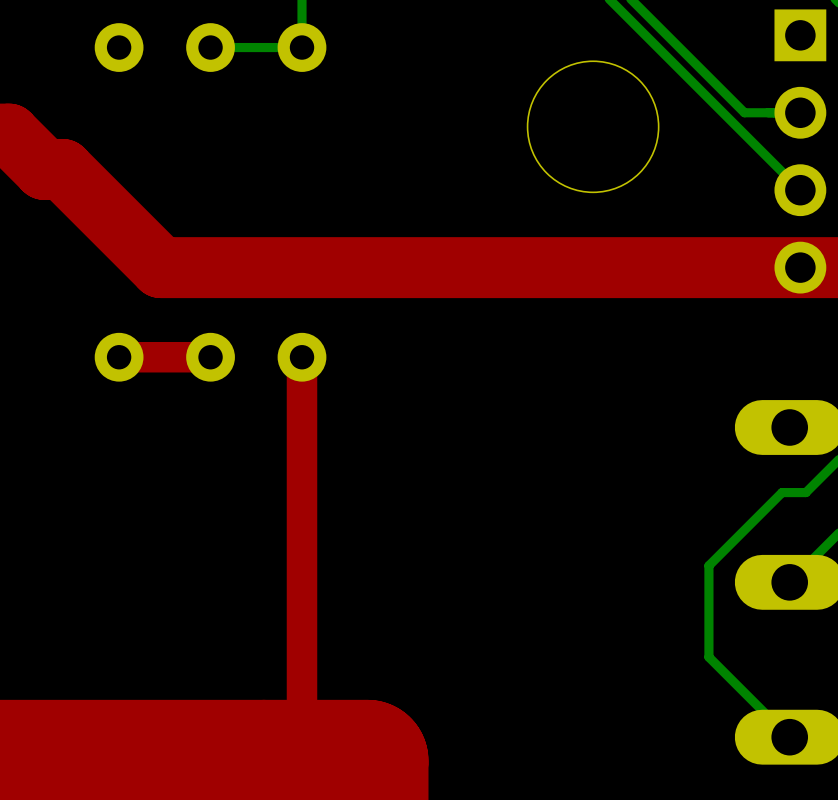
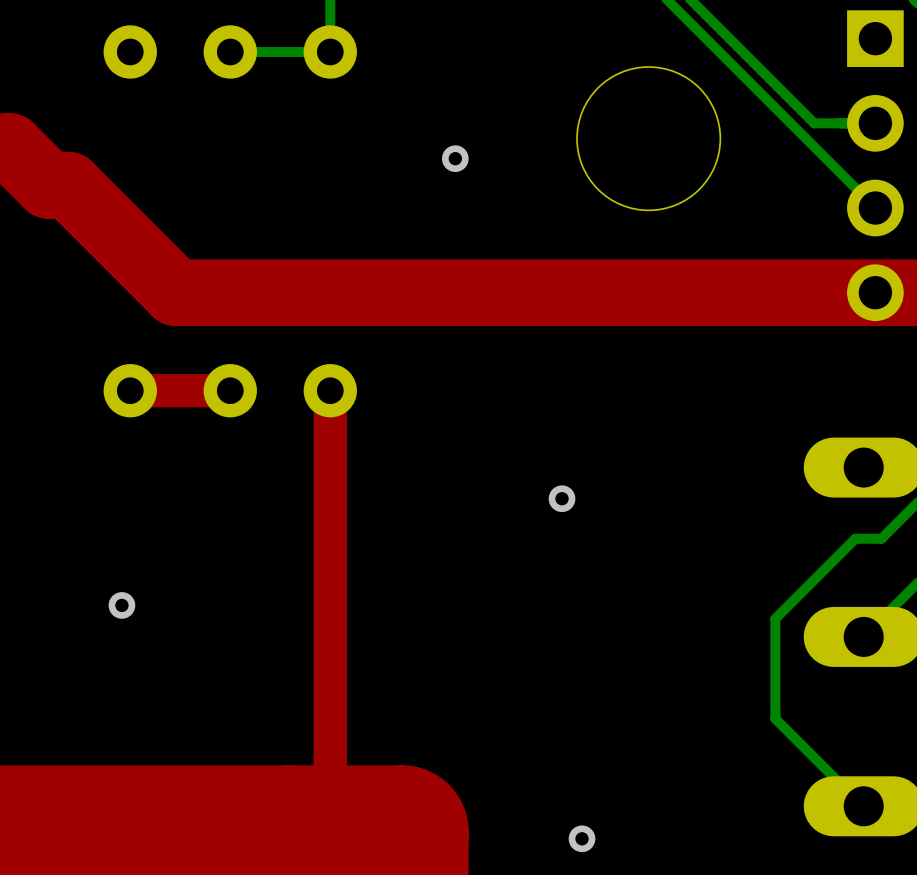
via: none -> (455, 158)
via: none -> (562, 498)
via: none -> (121, 605)
via: none -> (582, 838)

